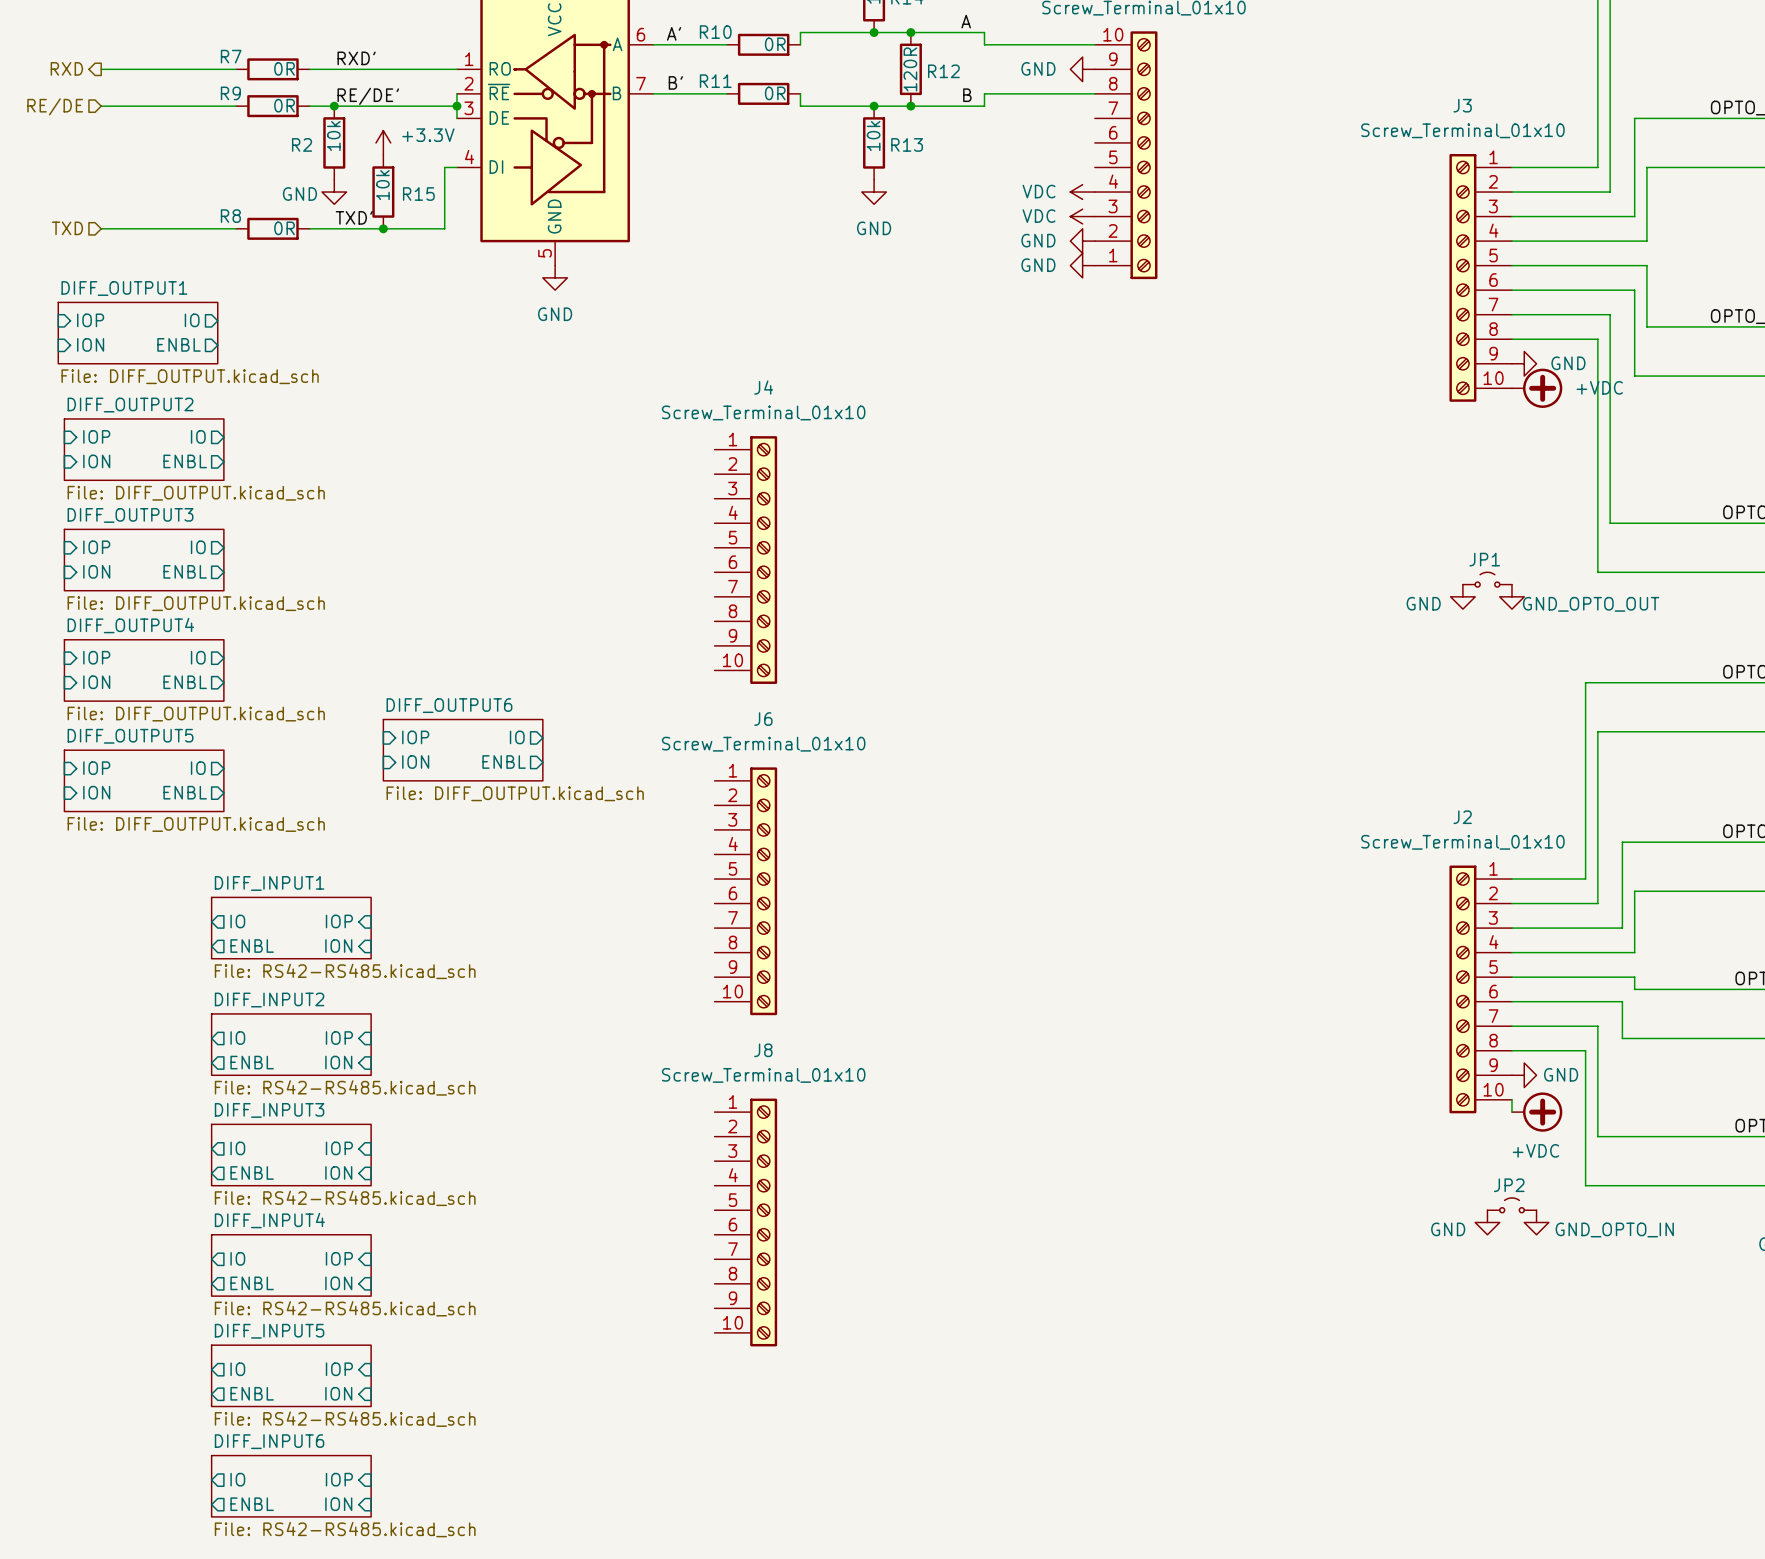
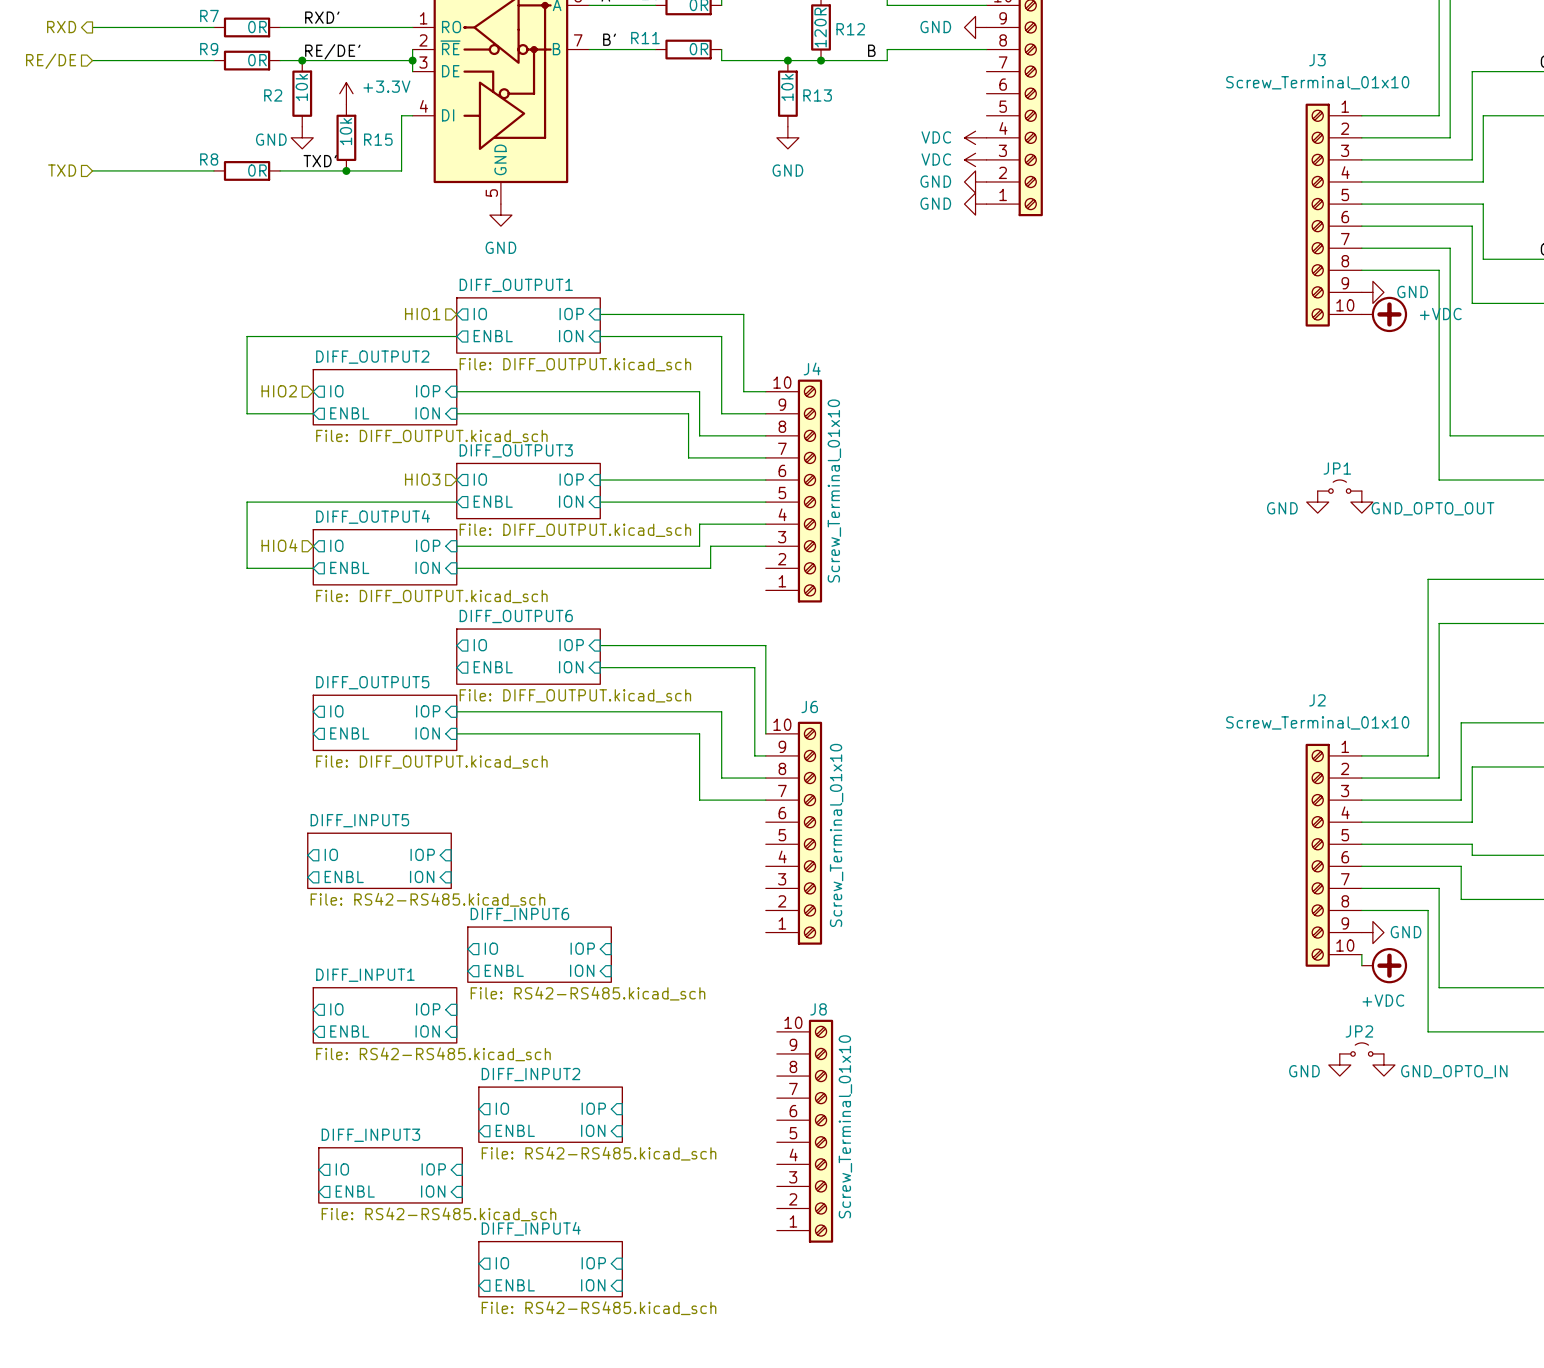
sheet pin: IOP (90, 320) -> none
sheet pin: IO (192, 320) -> none
sheet DIFF_OUTPUT1 position: (138, 333) -> (528, 325)
sheet pin: ION (90, 344) -> none
sheet pin: ENBL (179, 344) -> none
hierarchical label: none -> HIO1 (422, 314)
sheet pin: none -> IO (480, 314)
sheet pin: none -> IOP (571, 314)
J4 name position: J4 (763, 387) -> J4 (812, 368)
wire: none -> (600, 314) (743, 314) (743, 391) (765, 391)
wire: none -> (456, 336) (247, 336) (247, 413) (313, 413)
sheet pin: none -> ENBL (493, 336)
sheet pin: none -> ION (571, 336)
wire: none -> (600, 336) (721, 336) (721, 413) (765, 413)
J4 value position: Screw_Terminal_01x10 (763, 412) -> Screw_Terminal_01x10 (834, 491)
sheet pin: IOP (96, 436) -> none
sheet pin: IO (198, 436) -> none
sheet DIFF_OUTPUT2 position: (144, 449) -> (385, 397)
sheet pin: ION (96, 461) -> none
sheet pin: ENBL (185, 461) -> none
hierarchical label: none -> HIO2 (279, 391)
sheet pin: none -> IO (336, 391)
sheet pin: none -> IOP (428, 391)
wire: none -> (456, 391) (699, 391) (699, 435) (765, 435)
sheet pin: none -> ENBL (349, 413)
sheet pin: none -> ION (427, 413)
wire: none -> (456, 413) (688, 413) (688, 457) (765, 457)
sheet pin: IOP (96, 547) -> none
sheet pin: IO (198, 547) -> none
sheet DIFF_OUTPUT3 position: (144, 560) -> (528, 491)
J4 flip: as is (763, 560) -> up-down (809, 491)
sheet pin: ION (96, 571) -> none
sheet pin: ENBL (185, 571) -> none
hierarchical label: none -> HIO3 (422, 479)
sheet pin: none -> IO (480, 479)
sheet pin: none -> IOP (571, 479)
wire: none -> (600, 480) (765, 480)
wire: none -> (456, 502) (247, 502) (247, 568) (313, 568)
sheet pin: none -> ENBL (493, 501)
sheet pin: none -> ION (571, 501)
wire: none -> (600, 502) (765, 502)
wire: none -> (765, 524) (699, 524) (699, 546) (456, 546)
hierarchical label: none -> HIO4 (279, 545)
sheet pin: none -> IO (336, 545)
sheet pin: none -> IOP (428, 545)
wire: none -> (765, 546) (710, 546) (710, 568) (456, 568)
sheet pin: IOP (96, 657) -> none
sheet pin: IO (198, 657) -> none
sheet pin: none -> ENBL (349, 567)
sheet pin: none -> ION (427, 567)
sheet DIFF_OUTPUT4 position: (144, 670) -> (385, 557)
sheet pin: ION (96, 682) -> none
sheet pin: ENBL (185, 682) -> none
J6 name position: J6 (763, 719) -> J6 (809, 706)
sheet pin: IOP (415, 737) -> none
sheet pin rotation: 0° (517, 737) -> 180° (480, 645)
sheet pin position: IO (517, 737) -> IO (480, 645)
J6 value position: Screw_Terminal_01x10 (763, 744) -> Screw_Terminal_01x10 (836, 835)
sheet DIFF_OUTPUT6 position: (463, 750) -> (528, 656)
sheet pin: none -> IOP (571, 645)
wire: none -> (600, 645) (765, 645) (765, 733)
sheet pin: ION (415, 762) -> none
sheet pin rotation: 0° (504, 762) -> 180° (493, 667)
sheet pin: IOP (96, 768) -> none
sheet pin: IO (198, 768) -> none
sheet DIFF_OUTPUT5 position: (144, 780) -> (385, 722)
sheet pin: none -> ION (571, 667)
wire: none -> (600, 667) (754, 667) (754, 755) (765, 755)
sheet pin: ION (96, 792) -> none
sheet pin: ENBL (185, 792) -> none
sheet pin: none -> IO (336, 711)
sheet pin: none -> IOP (428, 711)
wire: none -> (456, 711) (721, 711) (721, 778) (765, 778)
sheet pin: none -> ENBL (349, 733)
sheet pin: none -> ION (427, 733)
wire: none -> (456, 733) (699, 733) (699, 800) (765, 800)
J6 position: (745, 891) -> (793, 833)
J6 flip: as is (763, 891) -> up-down (809, 833)
sheet pin: IO (237, 921) -> none
sheet pin: IOP (339, 921) -> none
sheet DIFF_INPUT1 position: (291, 928) -> (385, 1015)
sheet pin: ENBL (252, 946) -> none
sheet pin: ION (338, 946) -> none
sheet pin: none -> IO (331, 854)
sheet pin: none -> IOP (422, 854)
sheet pin: none -> ENBL (344, 876)
sheet pin: none -> ION (422, 876)
sheet pin: IO (237, 1038) -> none
sheet pin: IOP (339, 1038) -> none
sheet DIFF_INPUT2 position: (291, 1044) -> (550, 1114)
J8 name position: J8 (763, 1050) -> J8 (818, 1009)
sheet pin: ENBL (252, 1062) -> none
sheet pin: ION (338, 1062) -> none
J8 value position: Screw_Terminal_01x10 (763, 1075) -> Screw_Terminal_01x10 (845, 1126)
sheet pin: none -> IO (491, 948)
sheet pin: none -> IOP (582, 948)
sheet pin: none -> ENBL (504, 970)
sheet pin: none -> ION (582, 970)
sheet pin: IO (237, 1148) -> none
sheet pin: IOP (339, 1148) -> none
sheet DIFF_INPUT3 position: (291, 1155) -> (390, 1175)
sheet pin: none -> IO (336, 1009)
sheet pin: none -> IOP (428, 1009)
sheet pin: ENBL (252, 1172) -> none
sheet pin: ION (338, 1172) -> none
sheet pin: none -> ENBL (349, 1031)
sheet pin: none -> ION (427, 1031)
J8 position: (745, 1222) -> (805, 1131)
J8 flip: as is (763, 1222) -> up-down (821, 1131)
sheet pin: IO (237, 1258) -> none
sheet pin: IOP (339, 1258) -> none
sheet DIFF_INPUT4 position: (291, 1265) -> (550, 1269)
sheet pin: none -> IO (502, 1108)
sheet pin: none -> IOP (593, 1108)
sheet pin: ENBL (252, 1283) -> none
sheet pin: ION (338, 1283) -> none
sheet pin: none -> ENBL (515, 1130)
sheet pin: none -> ION (593, 1130)
sheet pin: none -> IO (342, 1169)
sheet pin: none -> IOP (433, 1169)
sheet pin: none -> ENBL (355, 1191)
sheet pin: none -> ION (433, 1191)
sheet pin: IO (237, 1369) -> none
sheet pin: IOP (339, 1369) -> none
sheet DIFF_INPUT5 position: (291, 1375) -> (379, 860)
sheet pin: ENBL (252, 1393) -> none
sheet pin: ION (338, 1393) -> none
sheet pin: none -> IO (502, 1263)
sheet pin: none -> IOP (593, 1263)
sheet pin: none -> ENBL (515, 1285)
sheet pin: none -> ION (593, 1285)
sheet pin: IO (237, 1479) -> none
sheet pin: IOP (339, 1479) -> none
sheet DIFF_INPUT6 position: (291, 1486) -> (539, 954)
sheet pin: ENBL (252, 1504) -> none
sheet pin: ION (338, 1504) -> none

